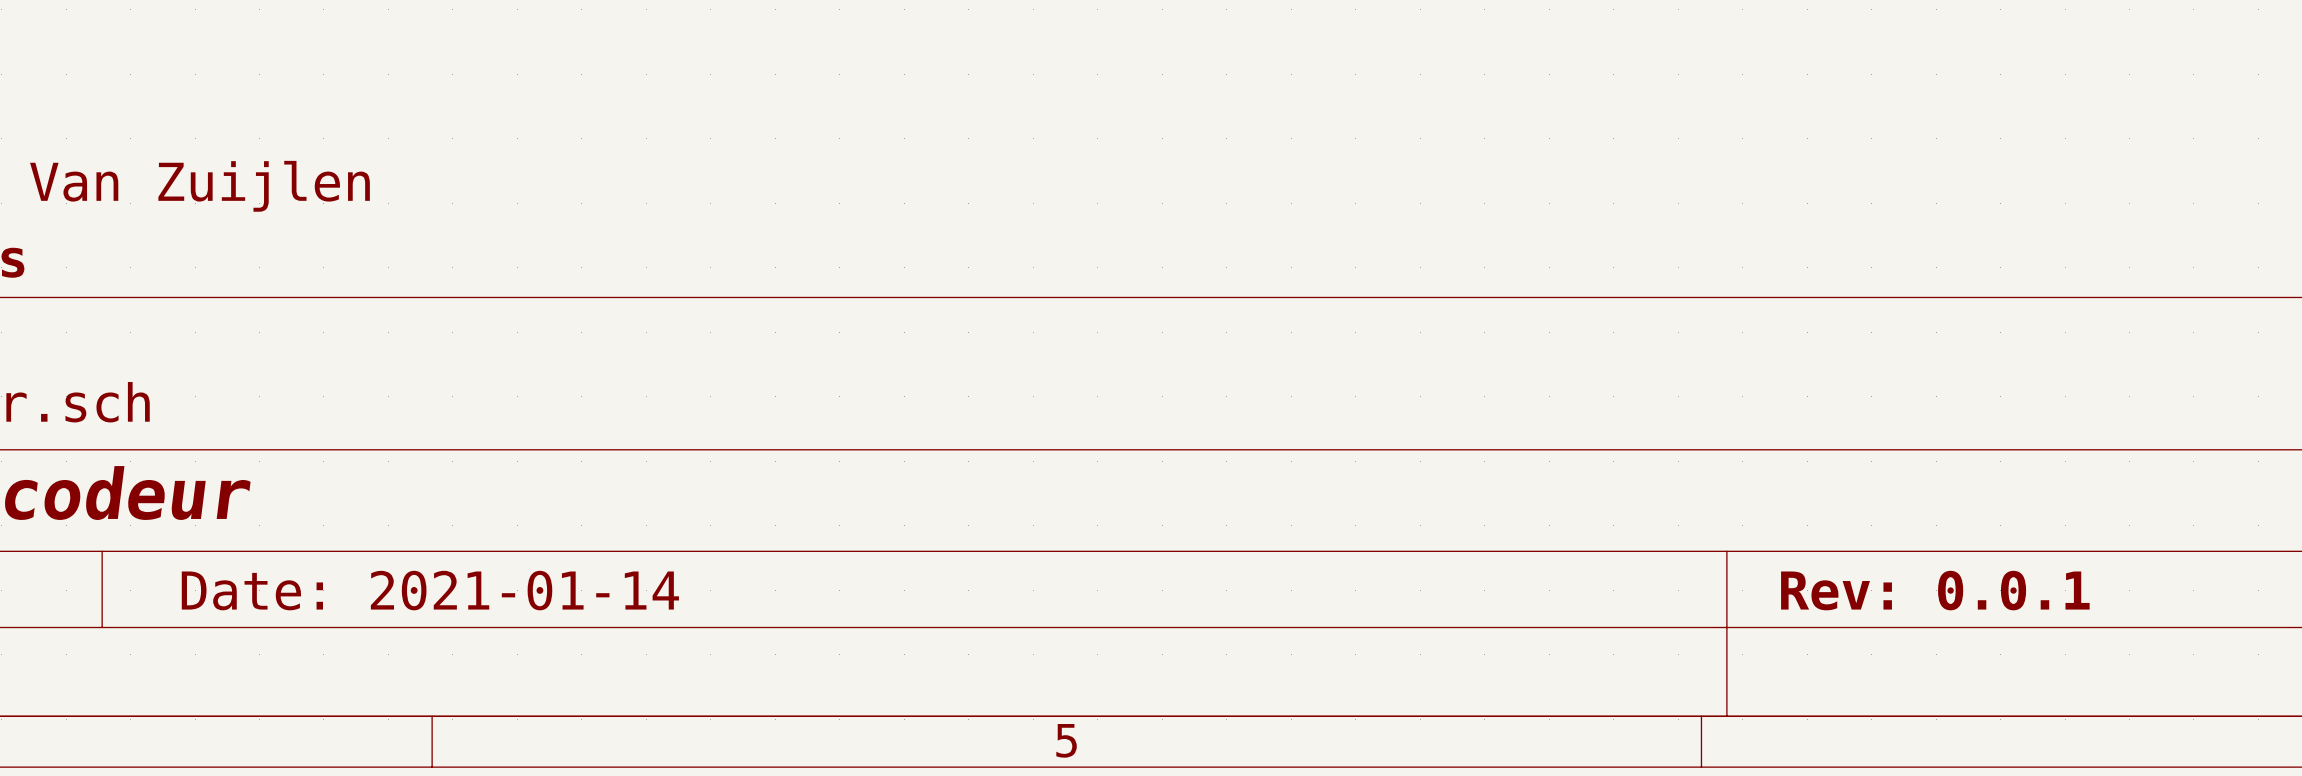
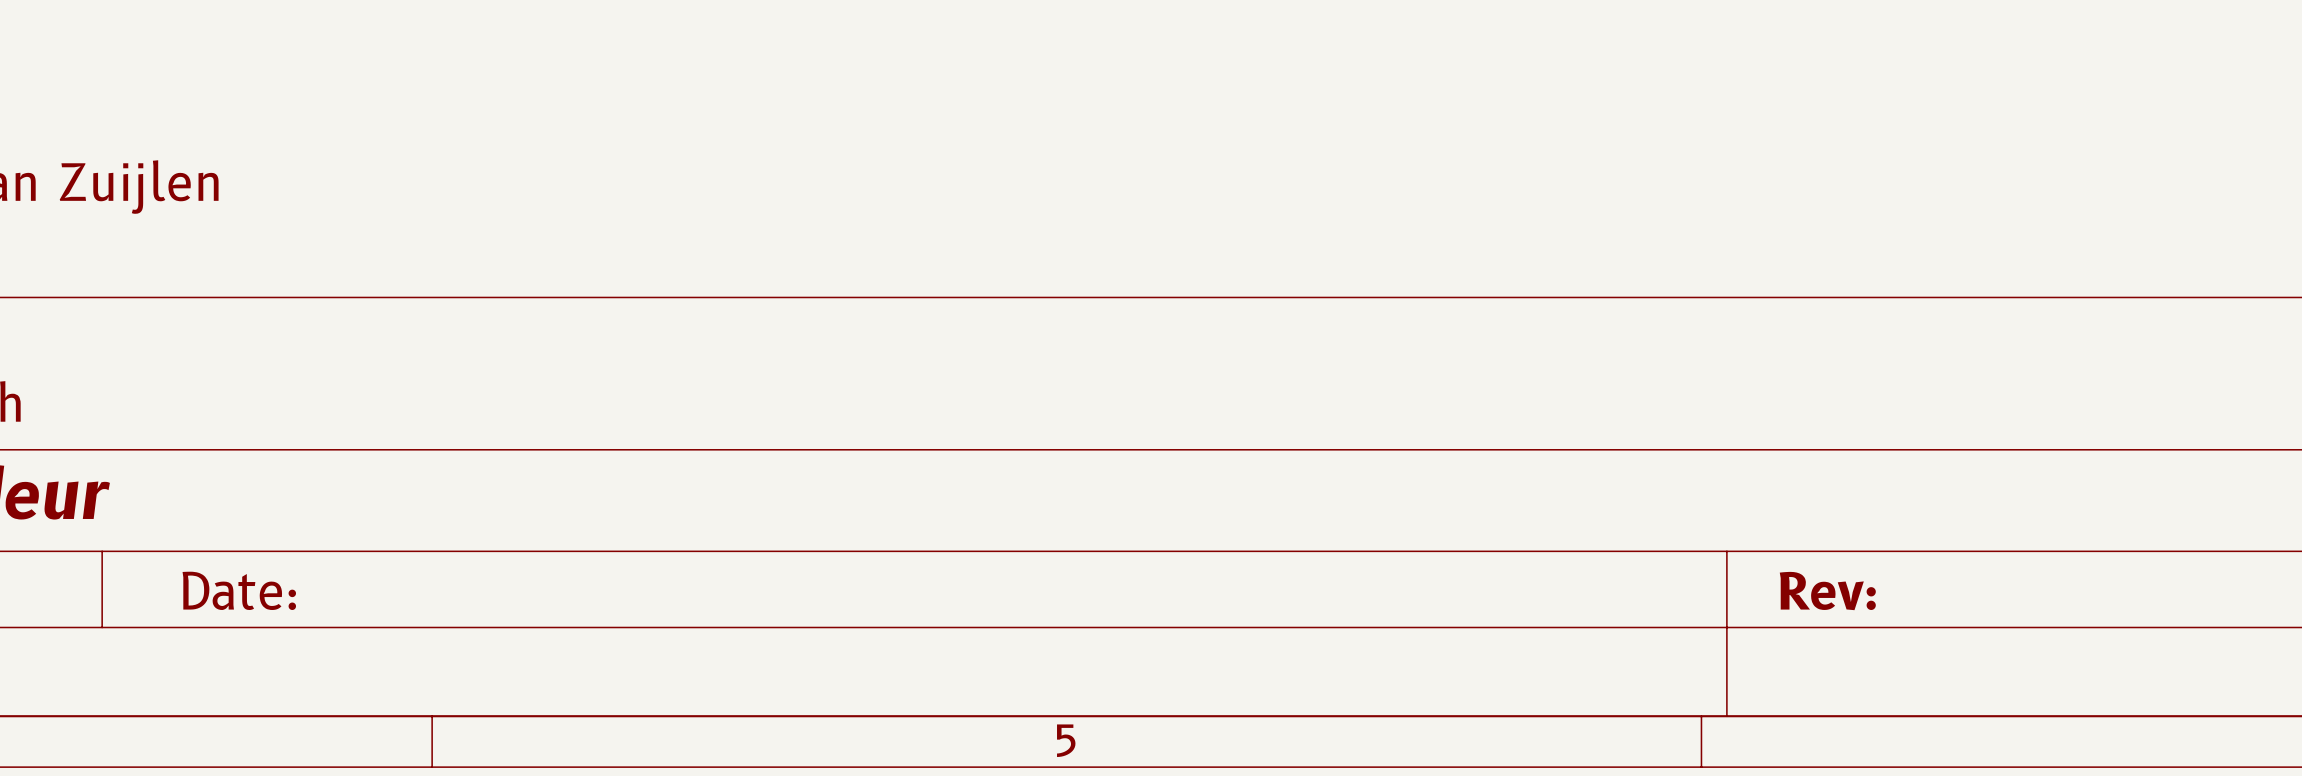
title block: Date: 2021-01-14 (430, 590) -> Date: (239, 590)
title block: Rev: 0.0.1 (1935, 590) -> Rev: (1827, 591)

